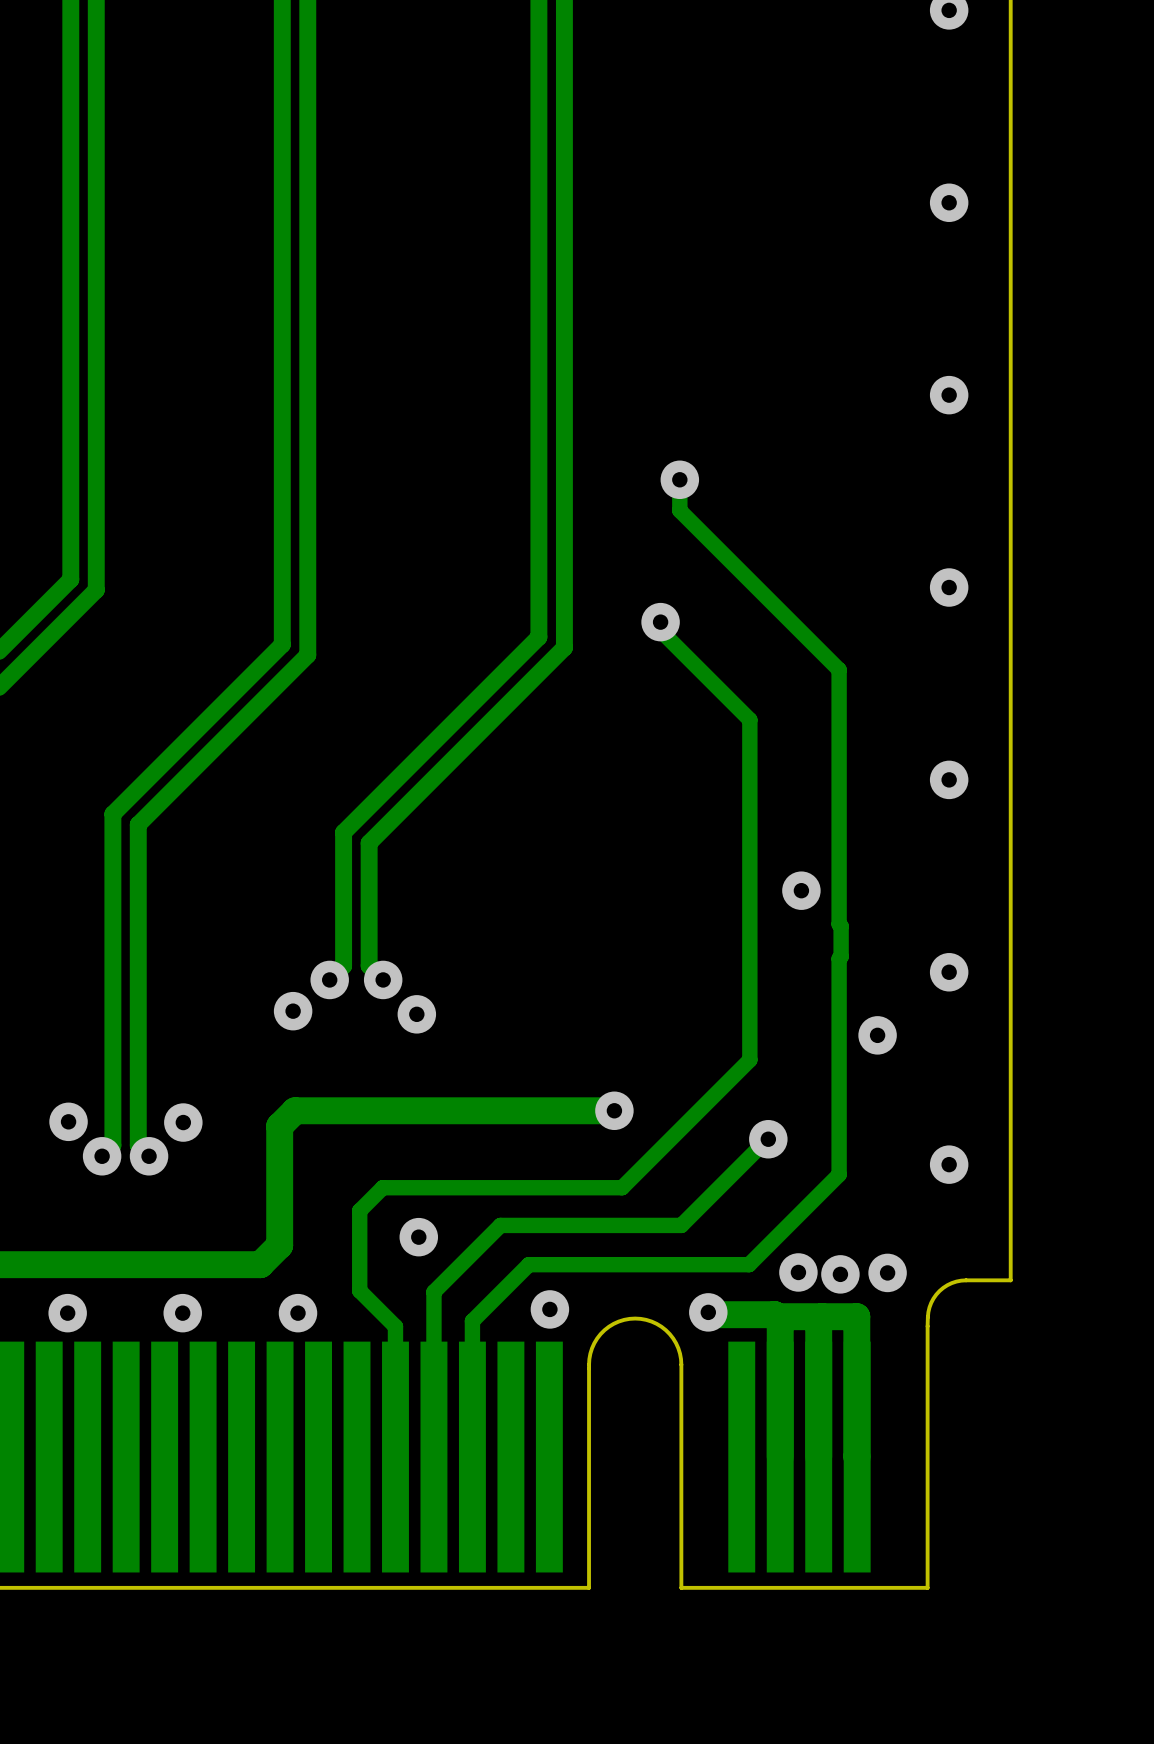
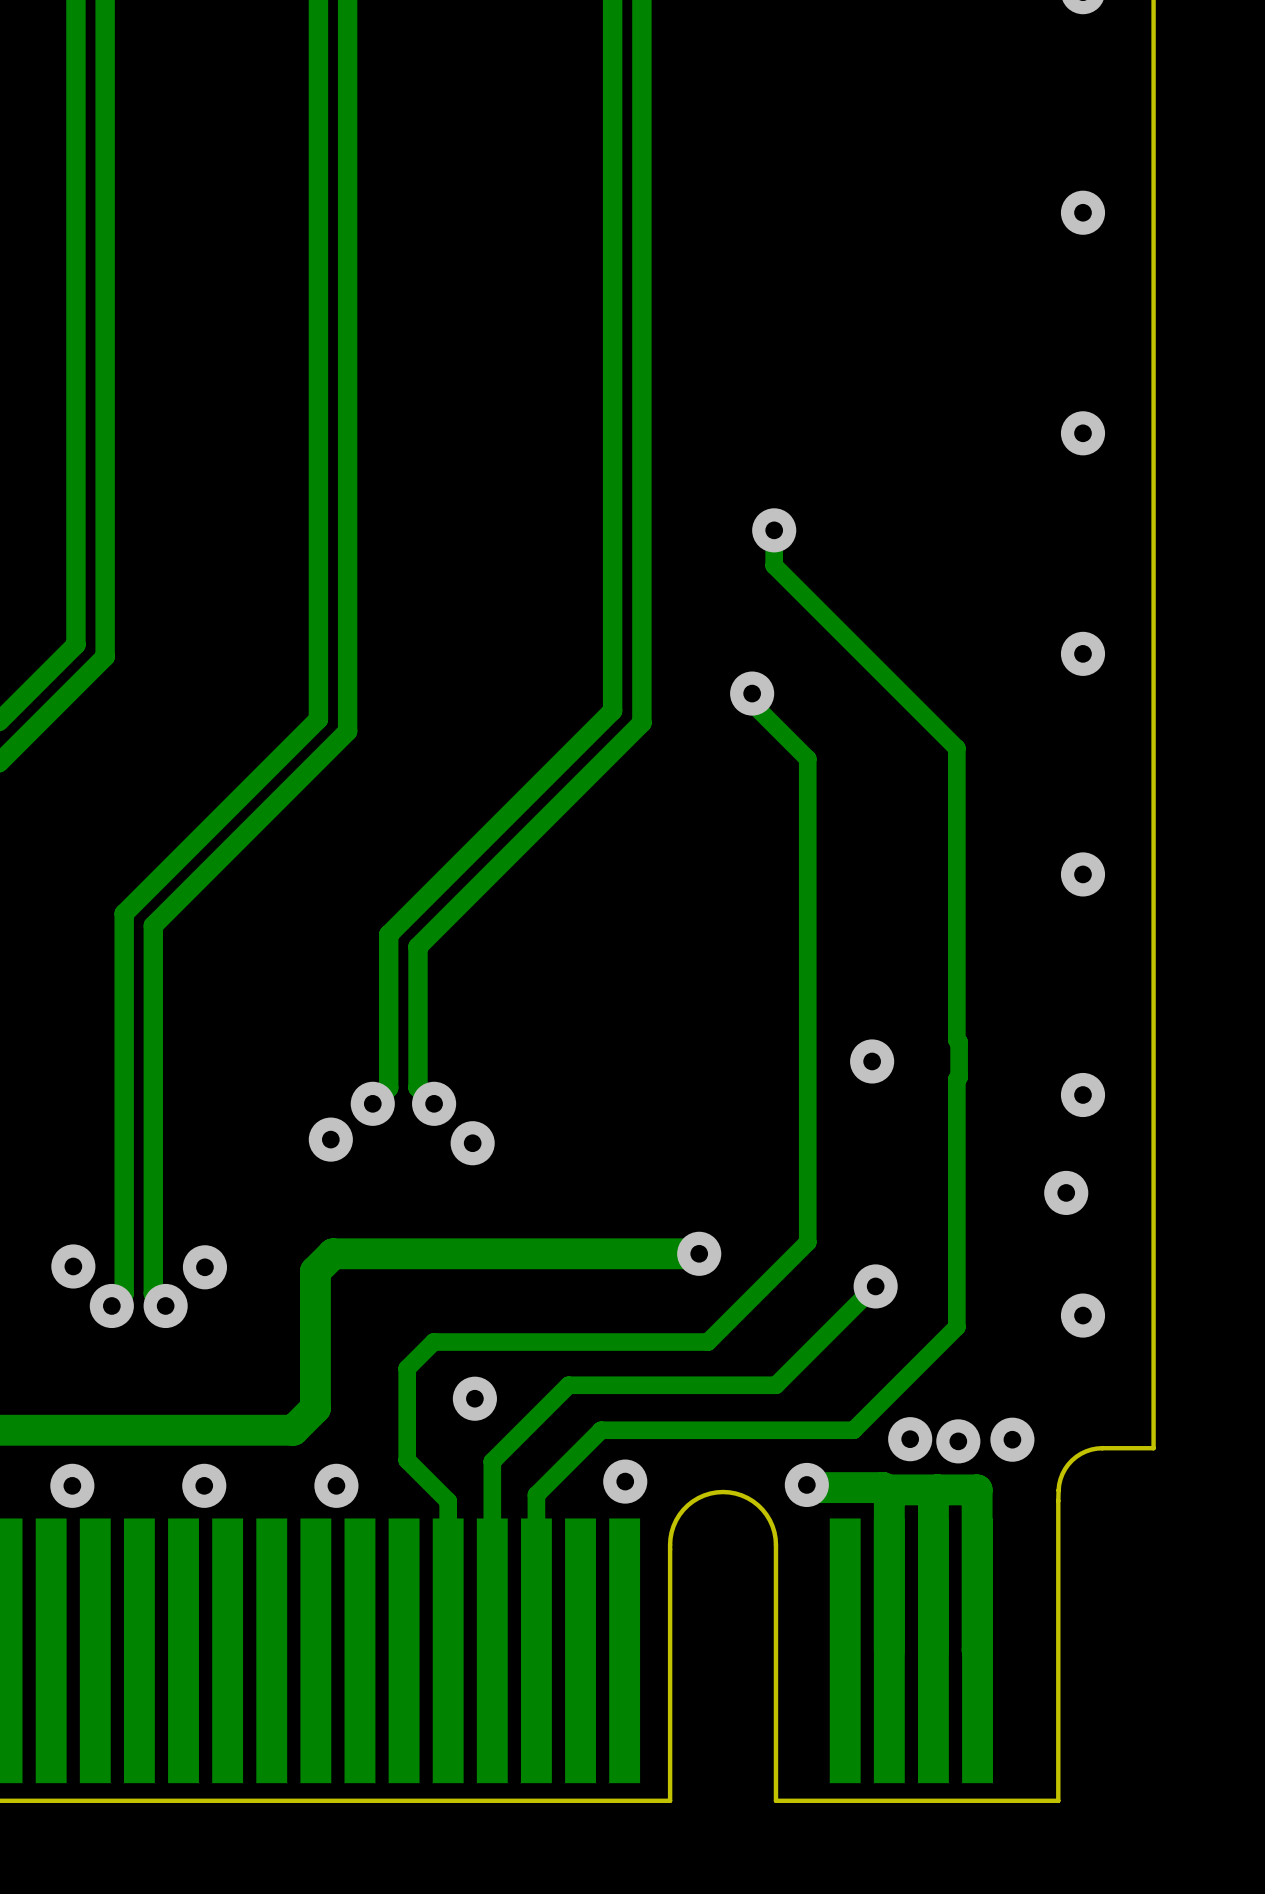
track: (709, 679) (749, 719) (749, 1059) (709, 1100) -> (807, 758) (807, 1242)
via position: (801, 890) -> (872, 1061)
via position: (877, 1035) -> (1066, 1192)

